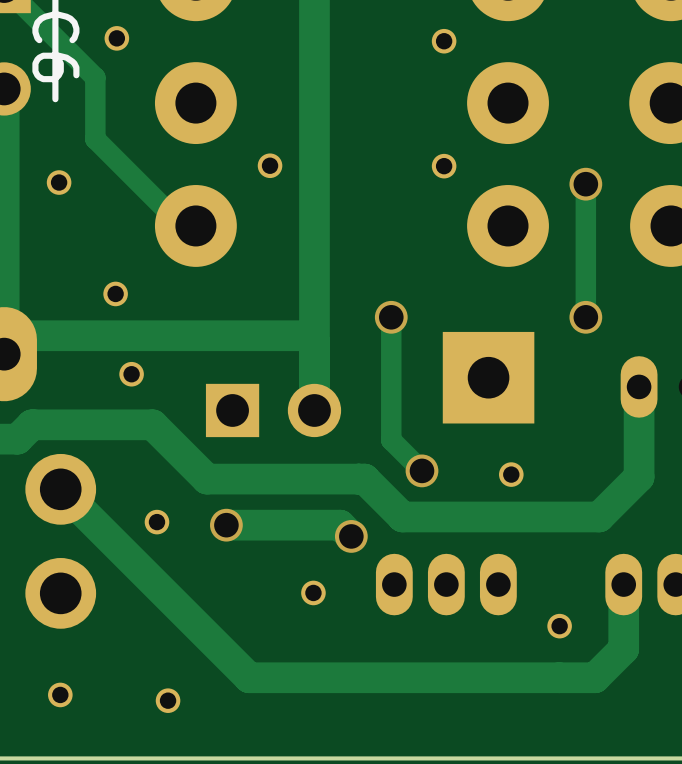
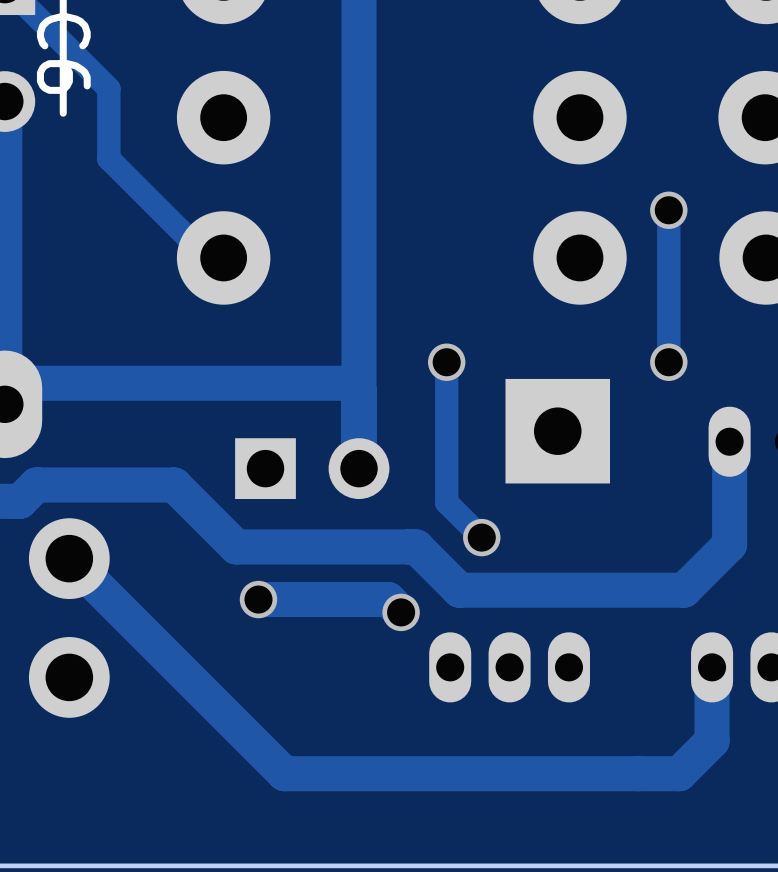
part: (116, 38) -> none
part: (444, 41) -> none
part: (270, 165) -> none
part: (444, 166) -> none
part: (59, 182) -> none
part: (115, 293) -> none
part: (131, 374) -> none
part: (511, 474) -> none
part: (156, 522) -> none
part: (313, 592) -> none
part: (559, 626) -> none
part: (60, 694) -> none
part: (168, 700) -> none

